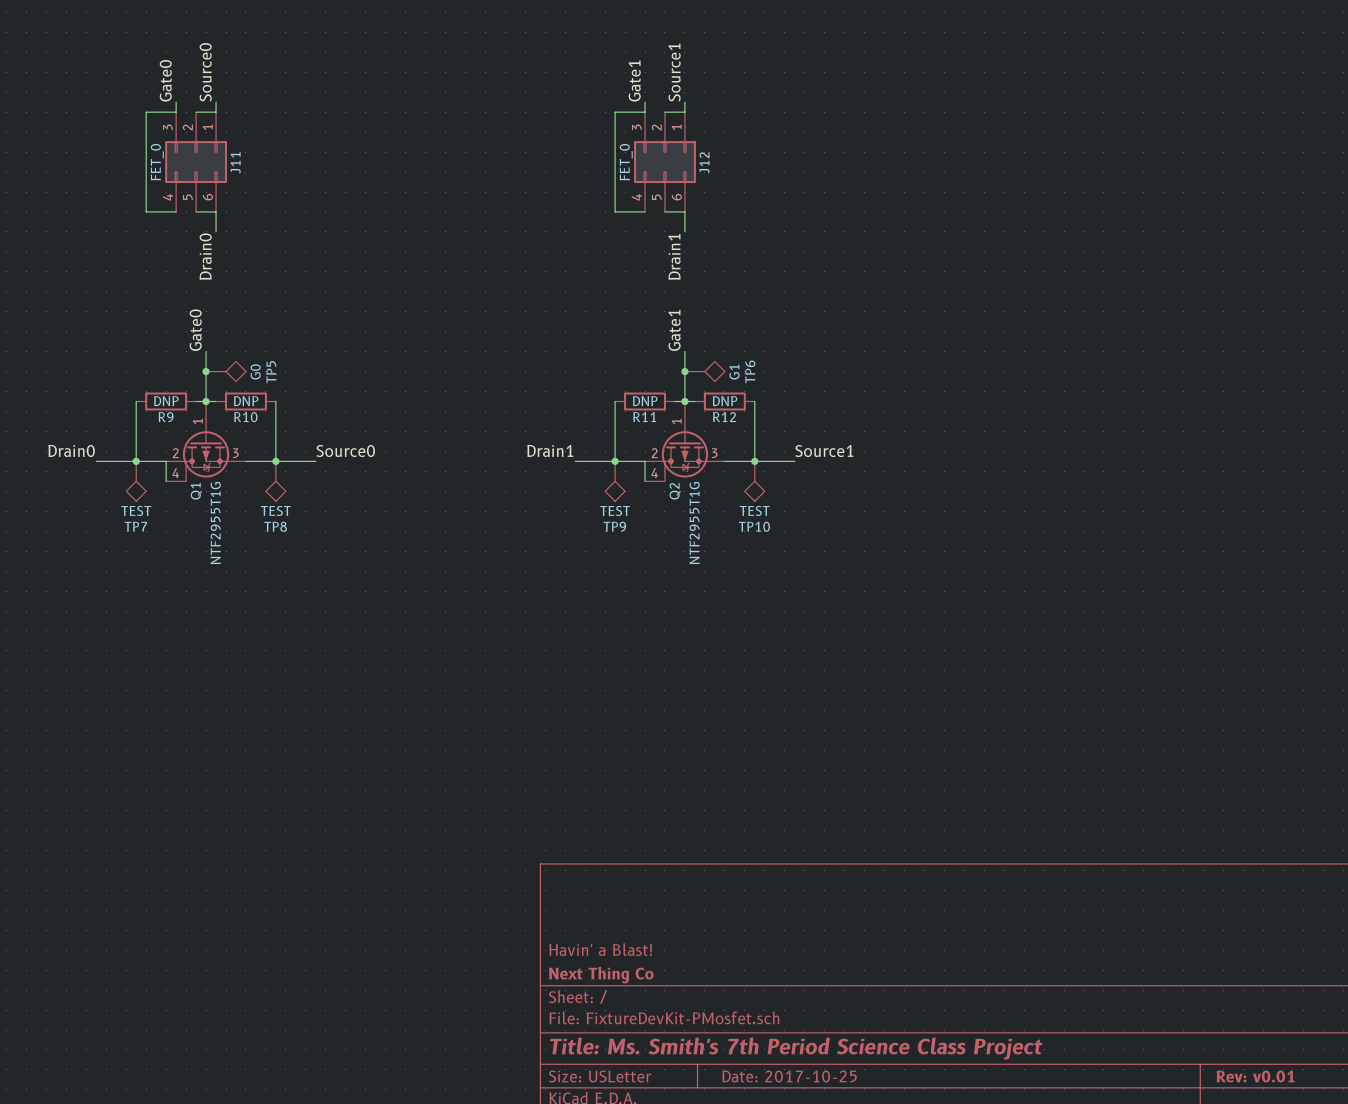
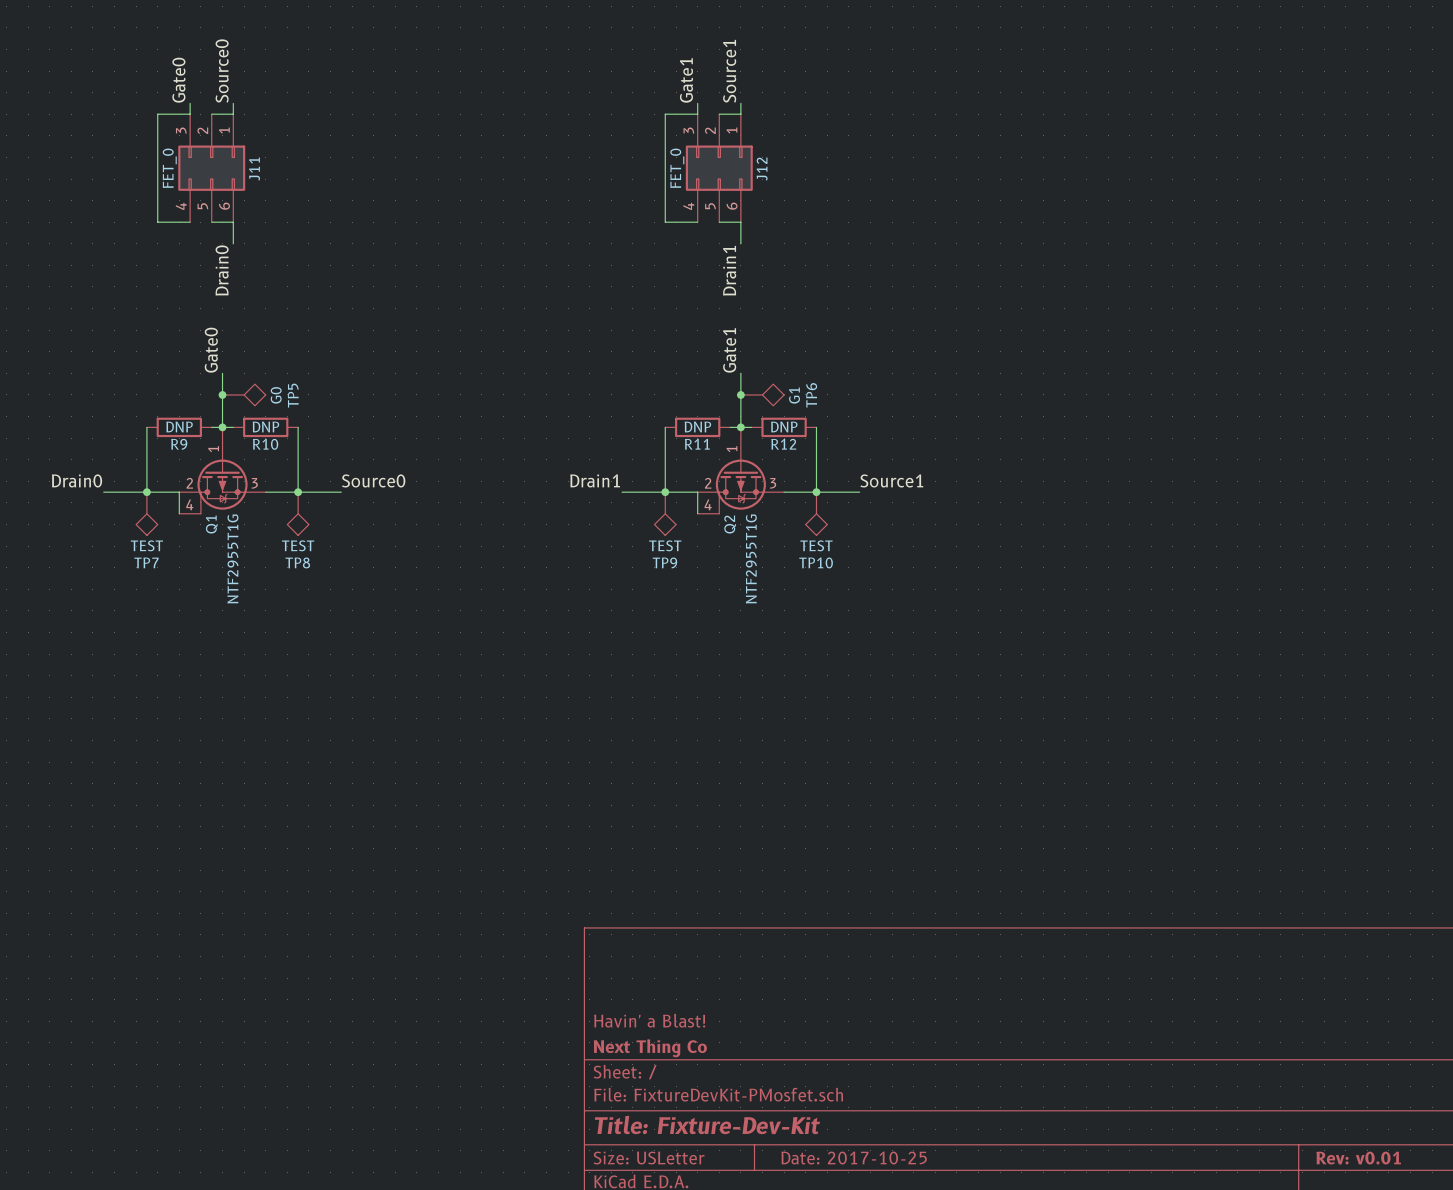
title block: Title: Ms. Smith's 7th Period Science Class Project (796, 1048) -> Title: Fixture-Dev-Kit (707, 1125)

